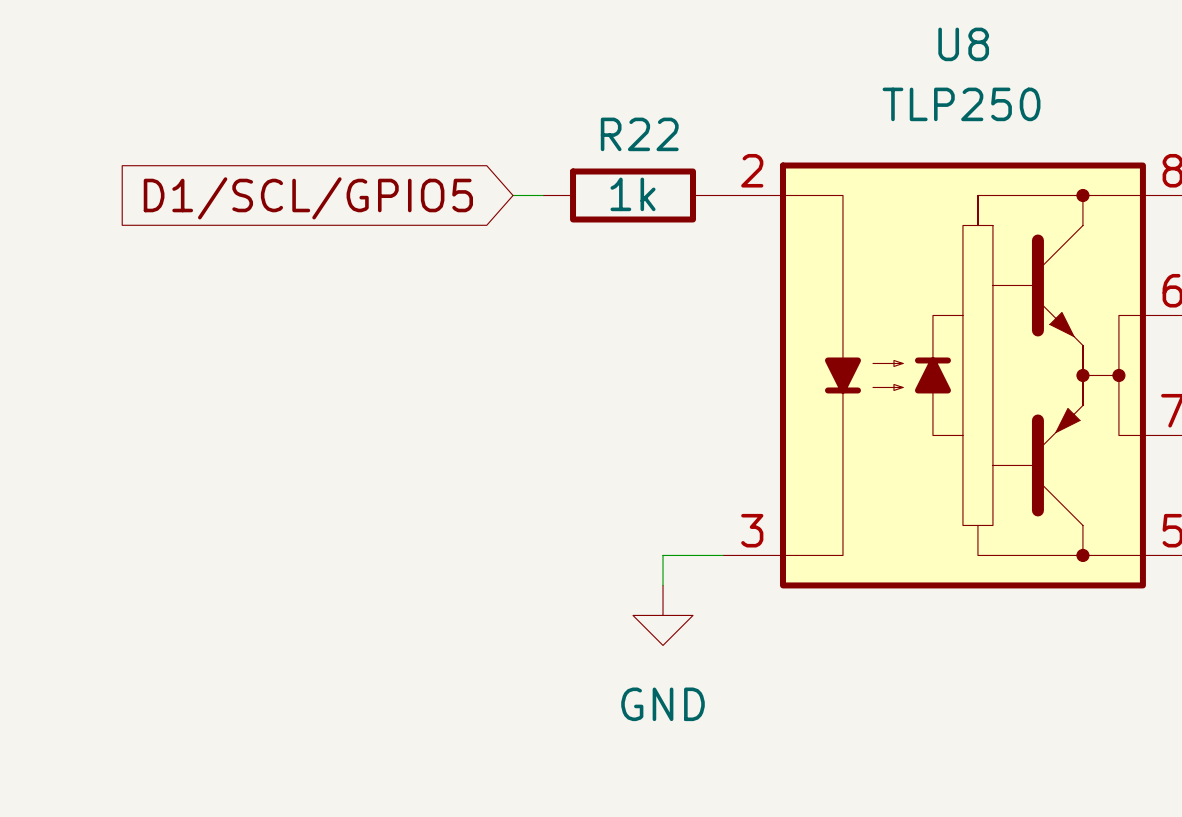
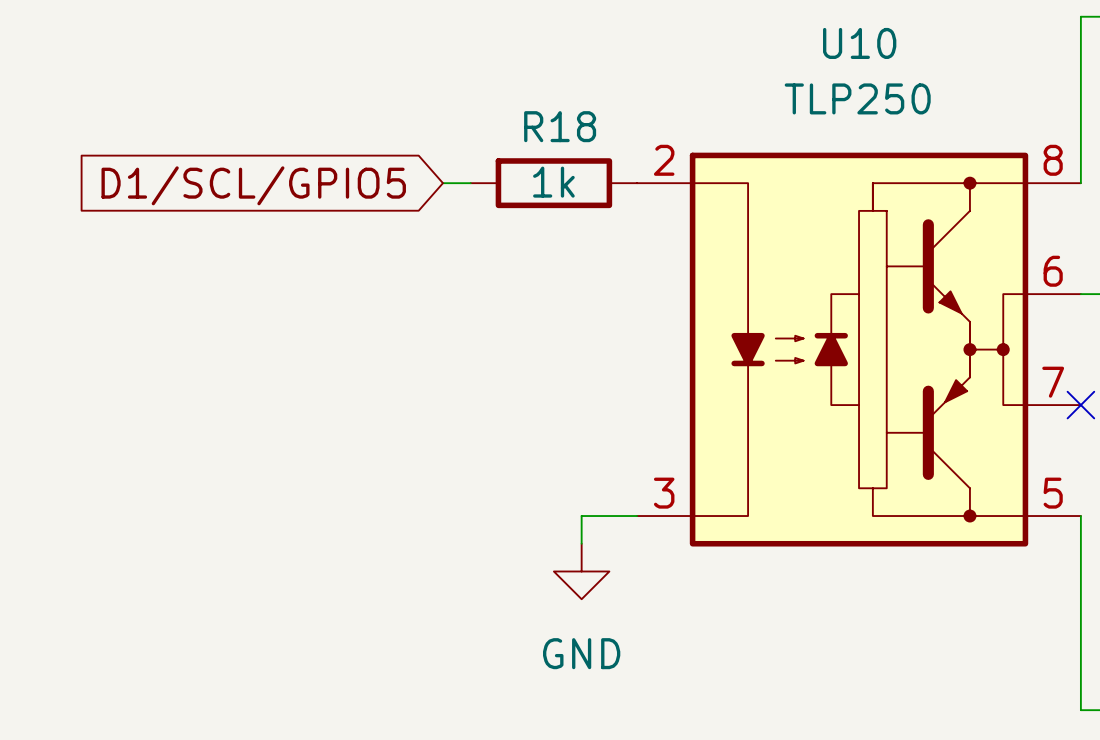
U8 name: U8 (963, 44) -> U10 (859, 43)
R22 name: R22 (639, 134) -> R18 (560, 126)

